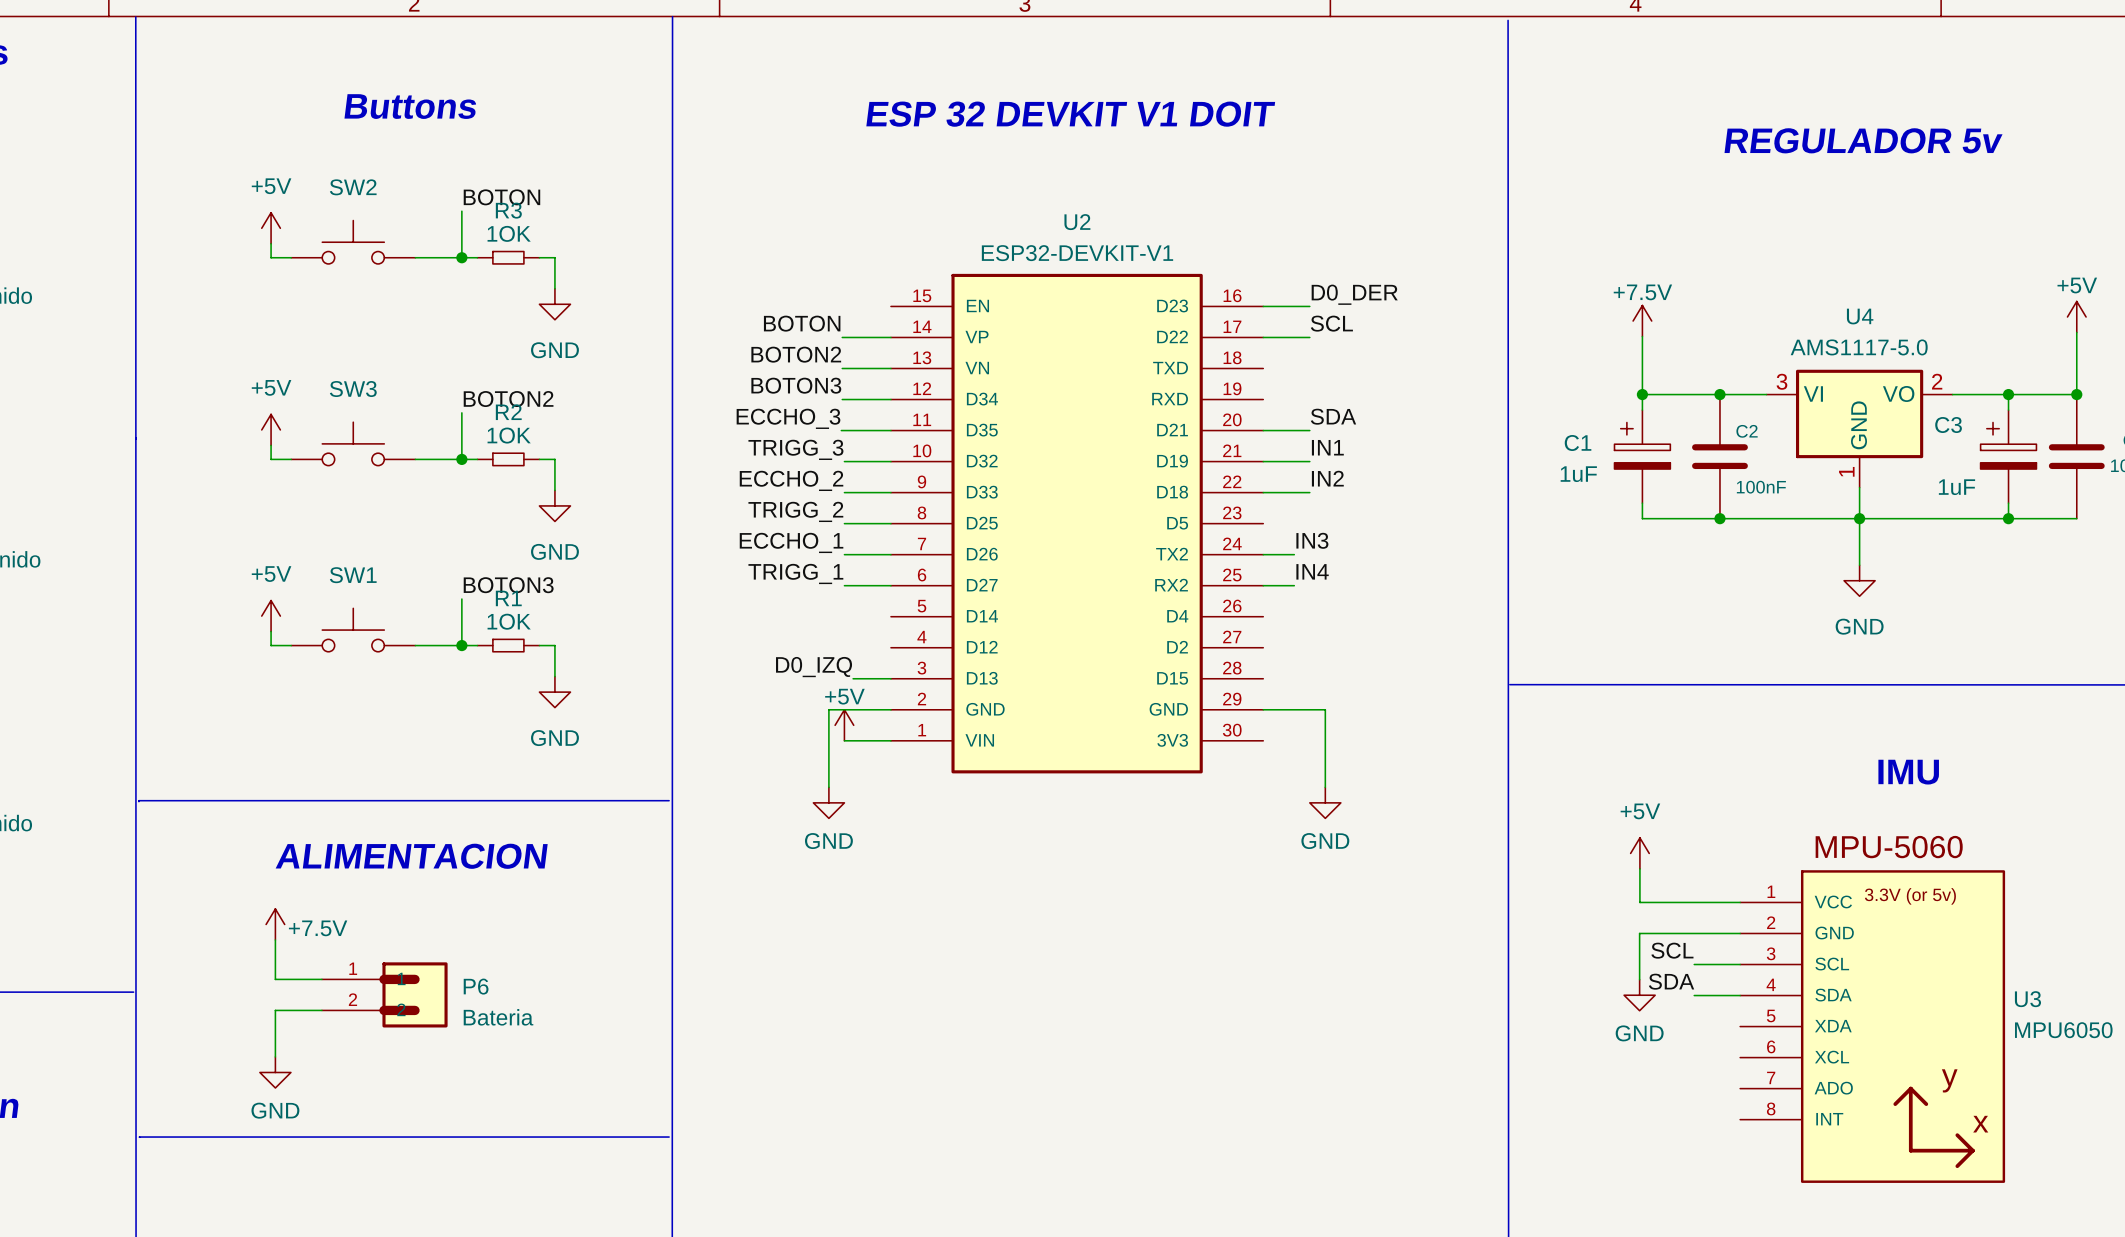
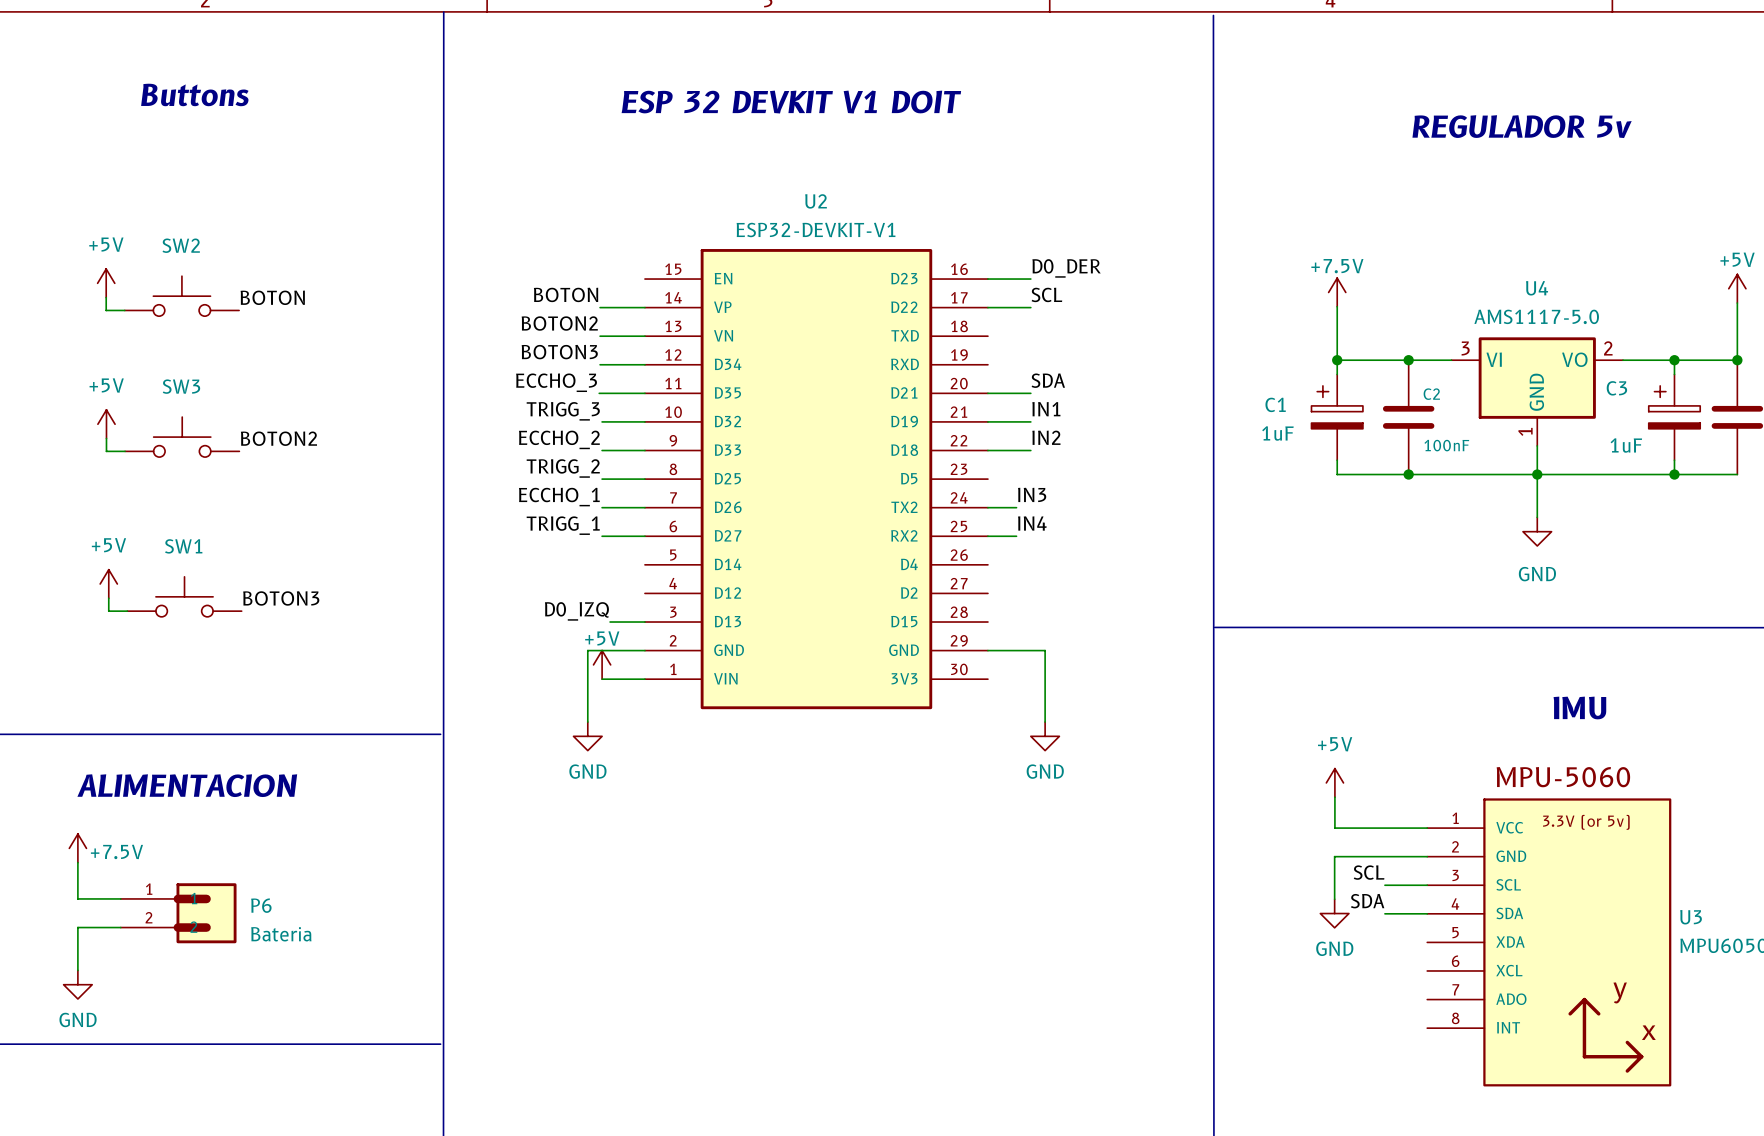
label position: BOTON (501, 197) -> BOTON (272, 297)
wire: (461, 211) (461, 257) -> none
power symbol: +5V (271, 228) -> none
SW2 position: (353, 242) -> (181, 296)
wire: (271, 243) (271, 257) (291, 257) -> (106, 297) (106, 310) (124, 310)
wire: (415, 257) (477, 257) -> none
junction: (461, 257) -> none
R3: 1OK (508, 257) -> none
wire: (539, 257) (554, 257) (554, 288) -> none
power symbol: GND (554, 304) -> none
power symbol: none -> +5V (106, 283)
label position: BOTON2 (508, 399) -> BOTON2 (278, 438)
wire: (461, 412) (461, 459) -> none
power symbol position: +5V (271, 429) -> +5V (106, 424)
SW3 position: (353, 443) -> (182, 437)
wire: (271, 445) (271, 459) (291, 459) -> (106, 438) (106, 451) (125, 451)
wire: (415, 459) (477, 459) -> none
junction: (461, 459) -> none
R2: 1OK (508, 459) -> none
wire: (539, 459) (554, 459) (554, 490) -> none
power symbol: GND (554, 505) -> none
label position: BOTON3 (508, 585) -> BOTON3 (281, 598)
wire: (461, 599) (461, 645) -> none
power symbol position: +5V (271, 616) -> +5V (108, 583)
SW1 position: (353, 630) -> (184, 596)
wire: (271, 631) (271, 645) (291, 645) -> (108, 598) (108, 611) (127, 611)
wire: (415, 645) (477, 645) -> none
junction: (461, 645) -> none
R1: 1OK (508, 645) -> none
wire: (539, 645) (554, 645) (554, 676) -> none
power symbol: GND (554, 692) -> none

